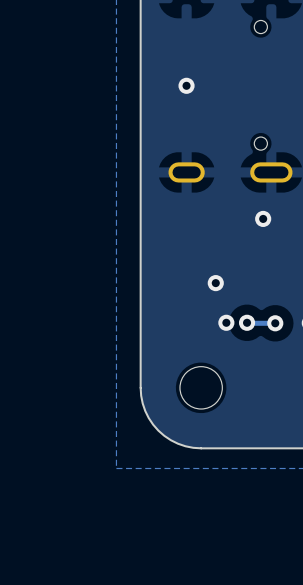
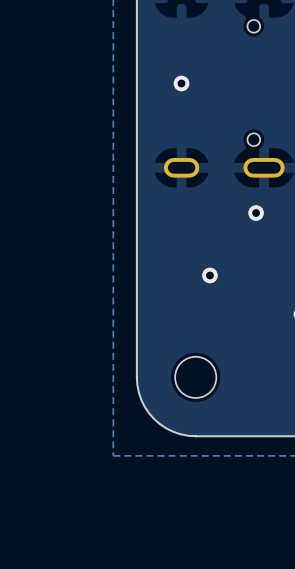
via: (226, 322) -> none
track: (247, 322) (275, 323) -> none
via: (247, 322) -> none
via: (275, 323) -> none

